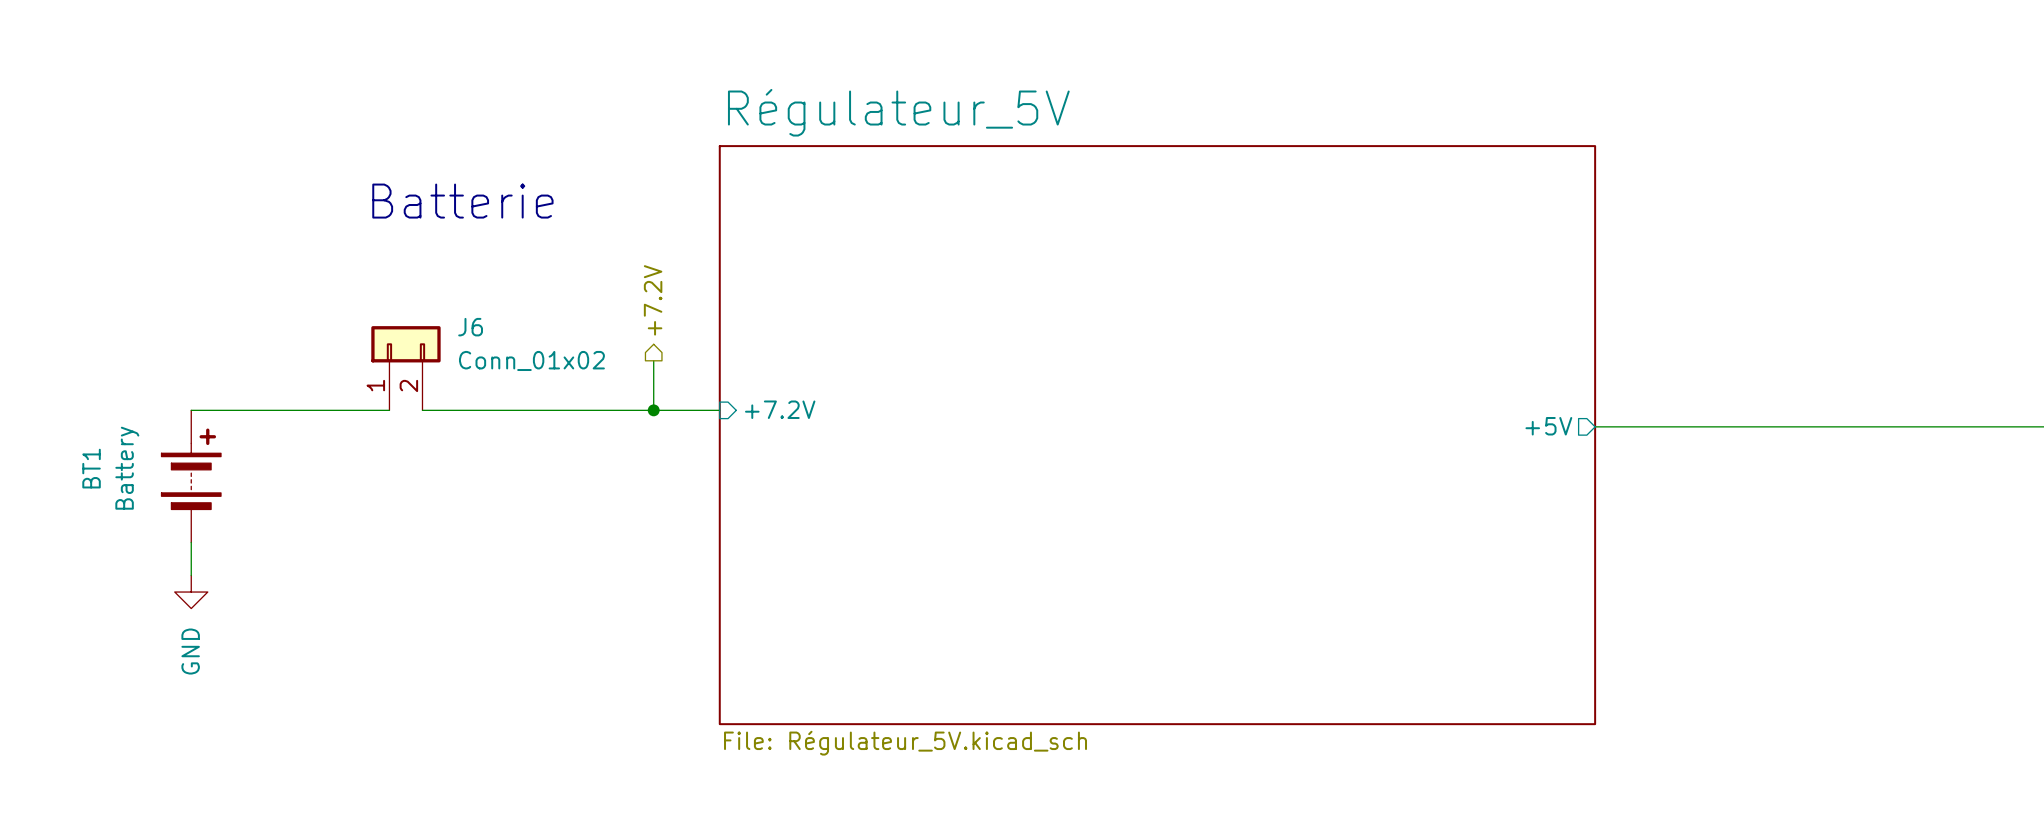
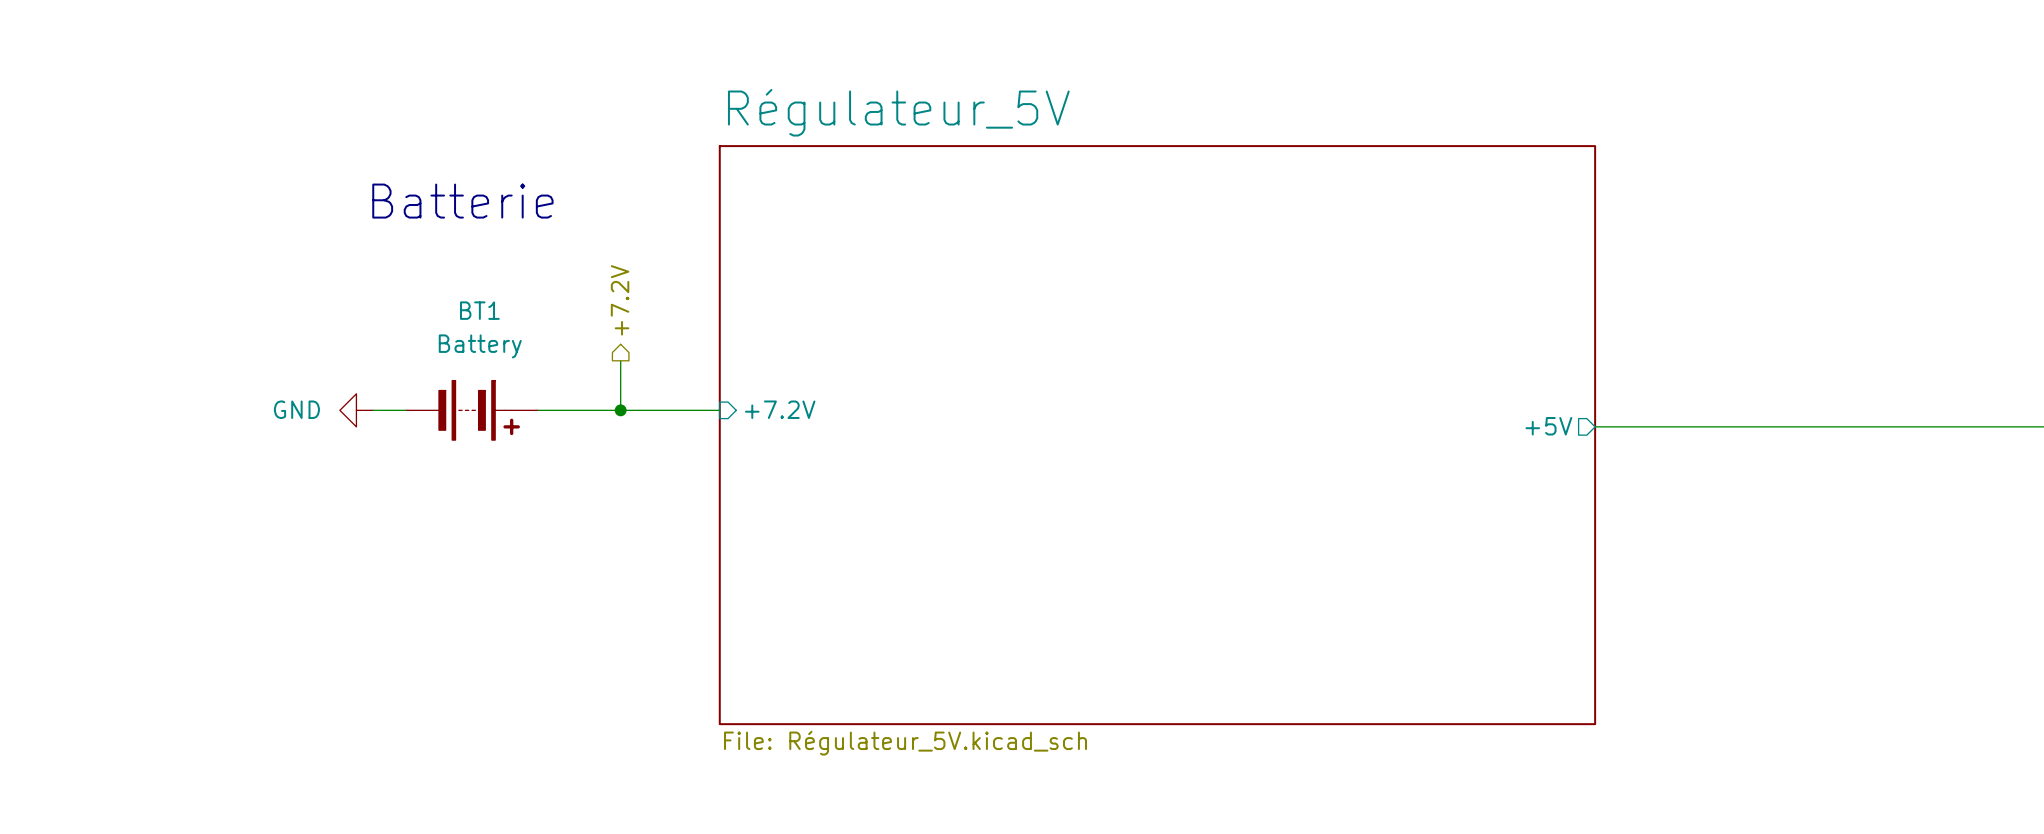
hierarchical label position: +7.2V (653, 300) -> +7.2V (620, 300)
wire: (653, 360) (653, 410) -> (620, 360) (620, 410)
J6: Conn_01x02 (405, 368) -> none
wire: (191, 410) (372, 410) -> none
wire: none -> (389, 410) (405, 410)
junction position: (653, 410) -> (620, 410)
BT1 rotation: 0° (191, 468) -> 90° clockwise (479, 410)
BT1 position: (191, 476) -> (472, 410)
wire: (191, 542) (191, 575) -> none
power symbol rotation: 0° (191, 592) -> 90° clockwise (356, 410)
power symbol position: GND (191, 592) -> GND (356, 410)

